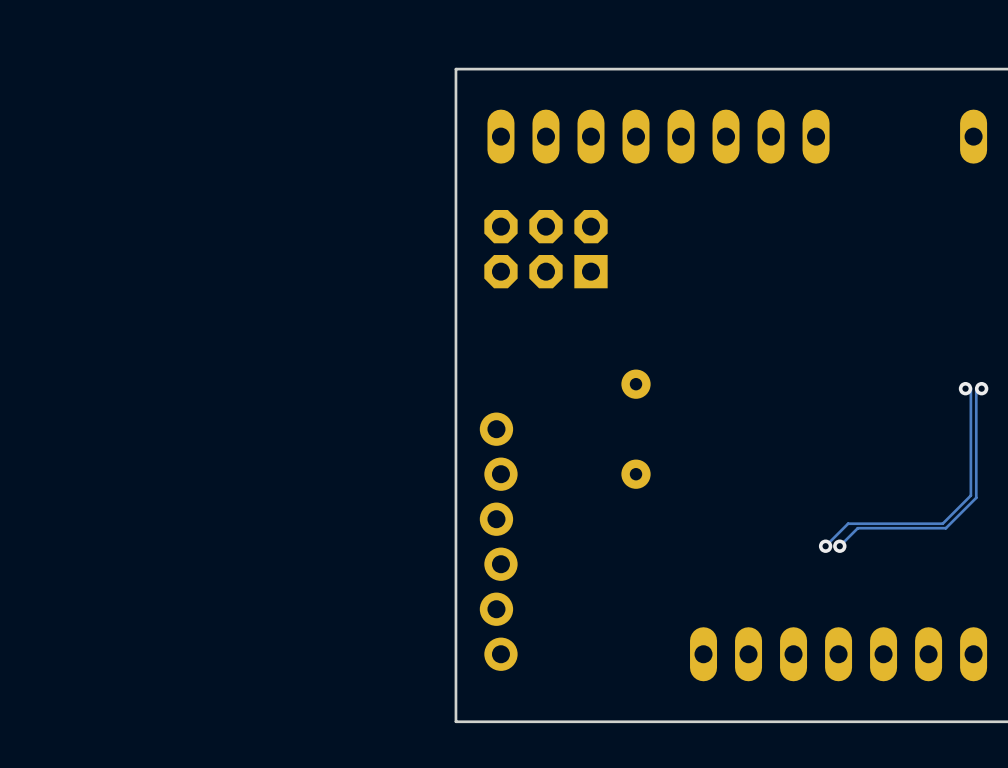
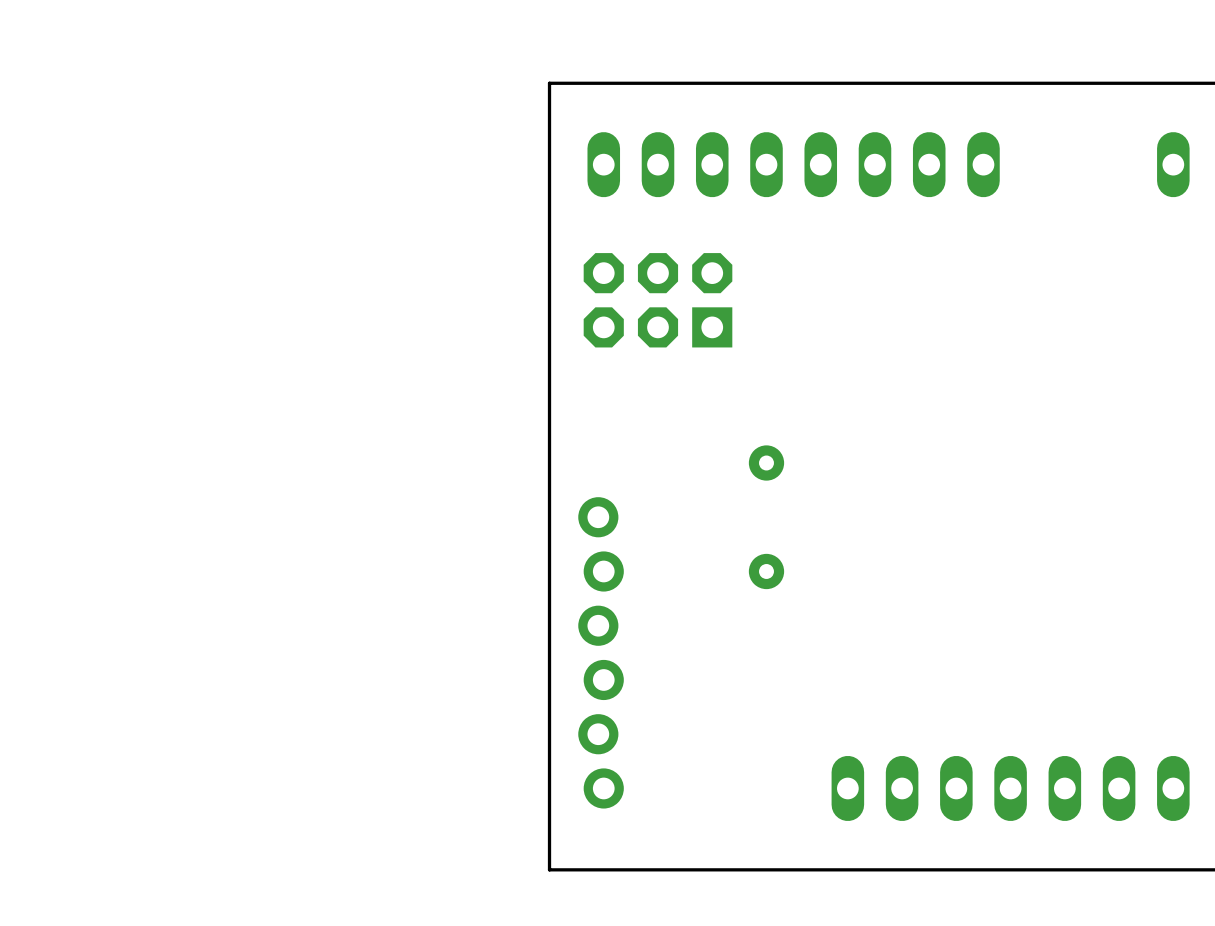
track: (965, 388) (970, 388) (970, 495) (942, 523) (848, 523) (825, 546) -> none
via: (965, 388) -> none
track: (981, 388) (976, 388) (976, 497) (945, 528) (857, 528) (839, 546) -> none
via: (981, 388) -> none
via: (825, 546) -> none
via: (839, 546) -> none

